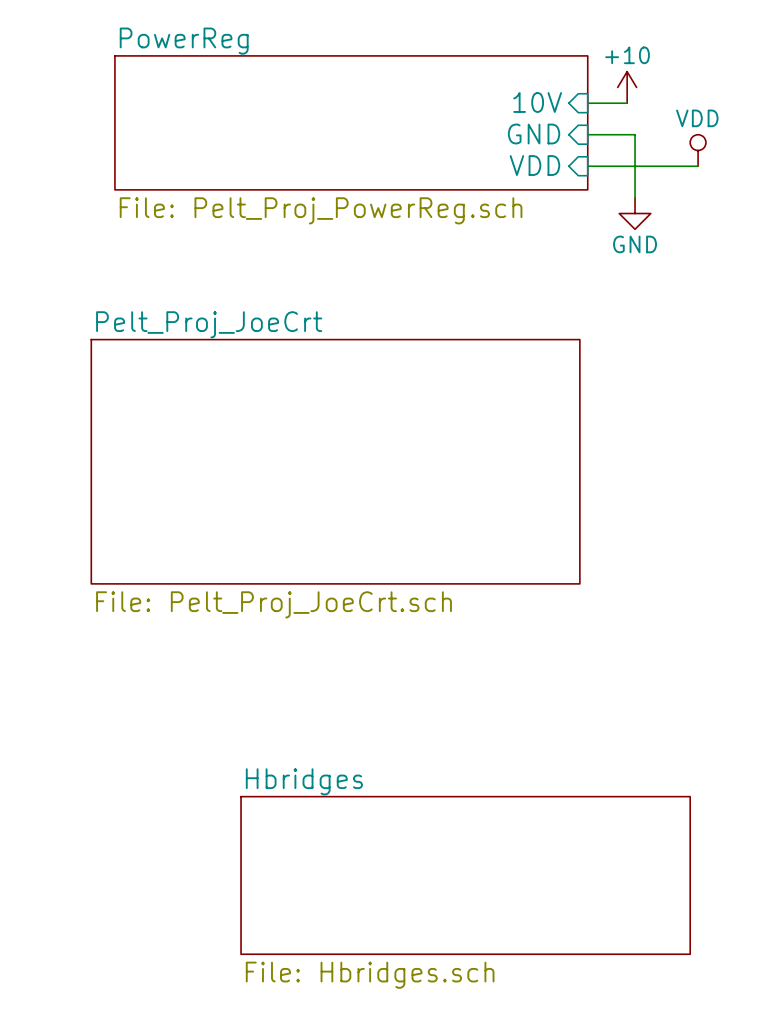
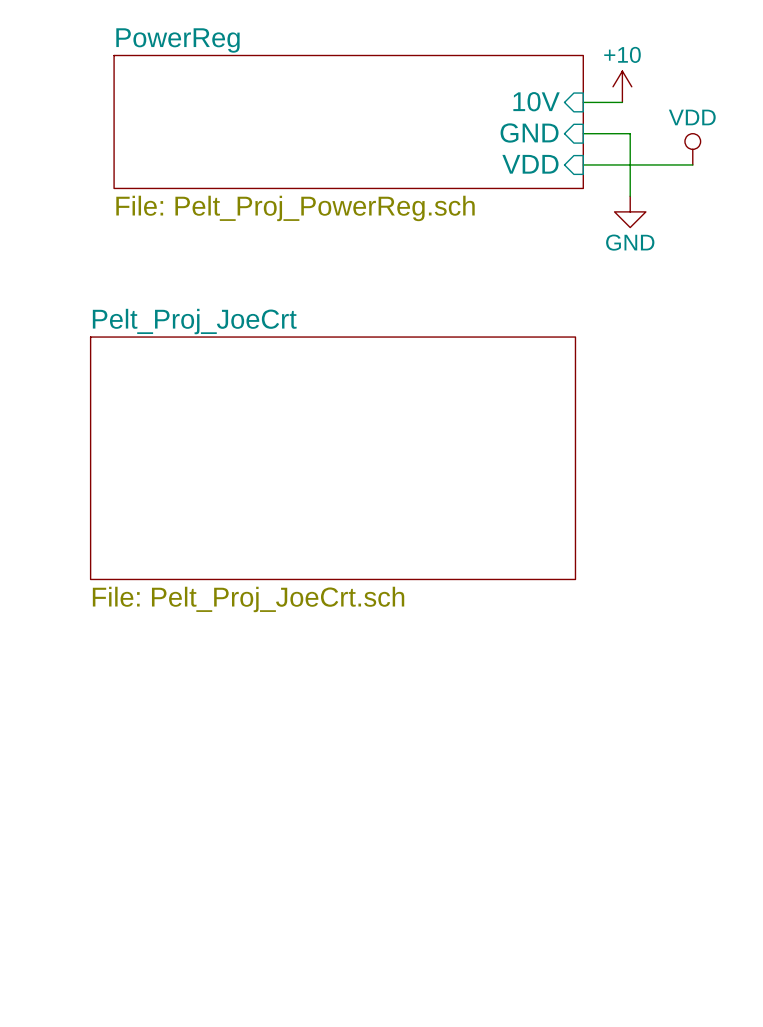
sheet Hbridges: File: Hbridges.sch (465, 875) -> none

